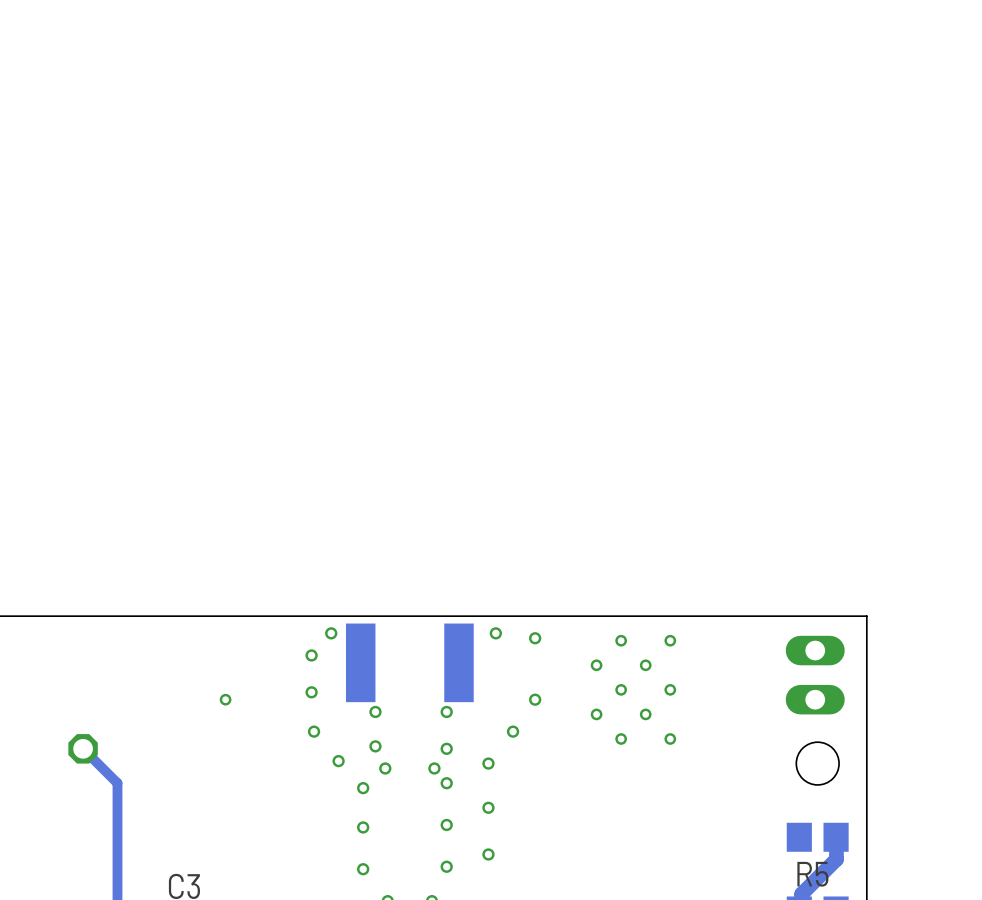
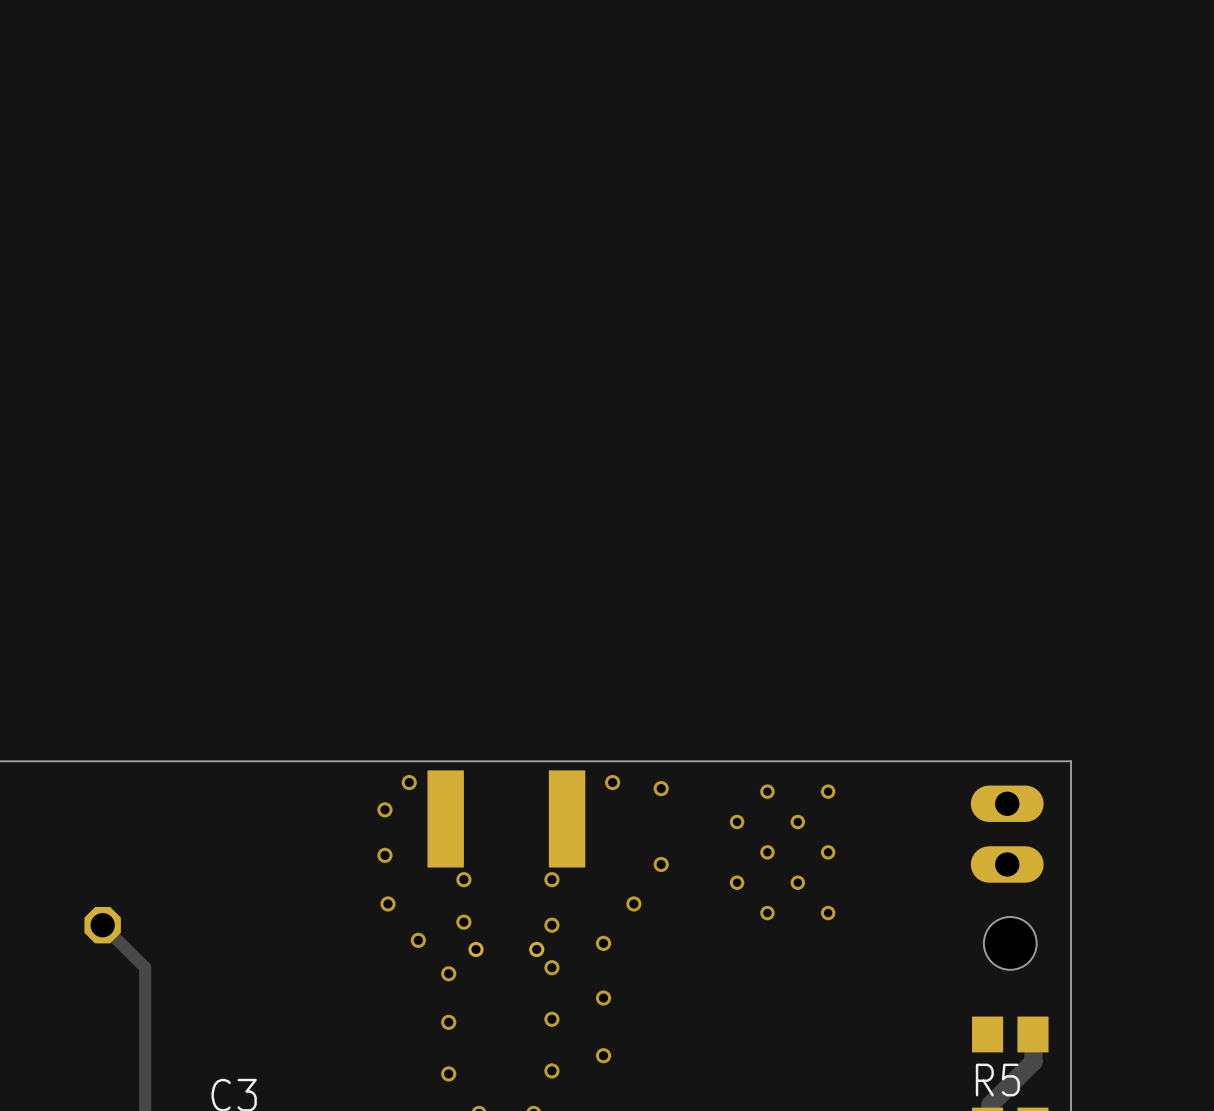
via: (225, 699) -> none

